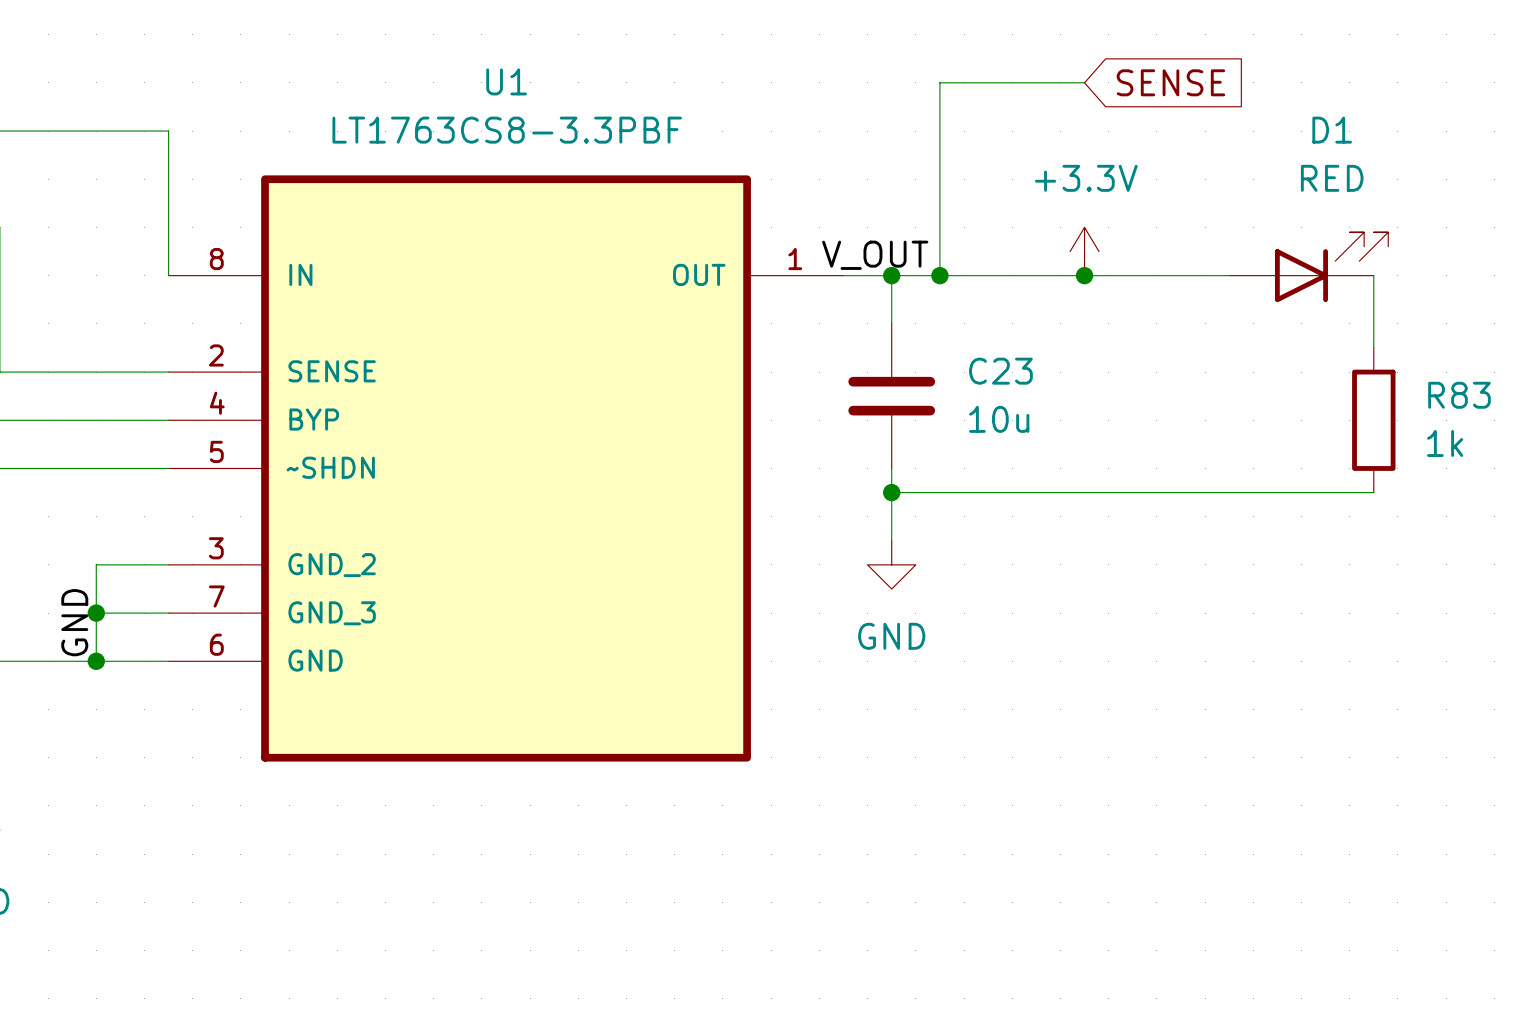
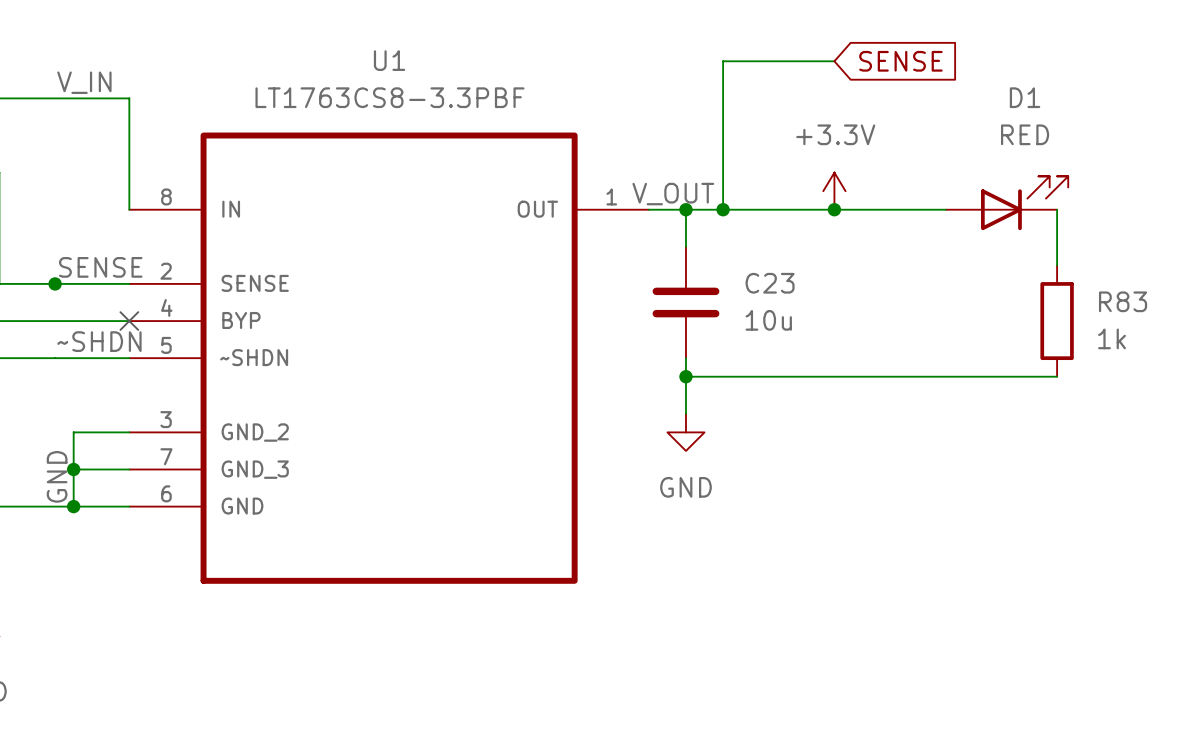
label: none -> V_IN (84, 82)
label: none -> SENSE (100, 267)
junction: none -> (55, 283)
no-connect mark: none -> (129, 321)
label: none -> ~SHDN (99, 341)

